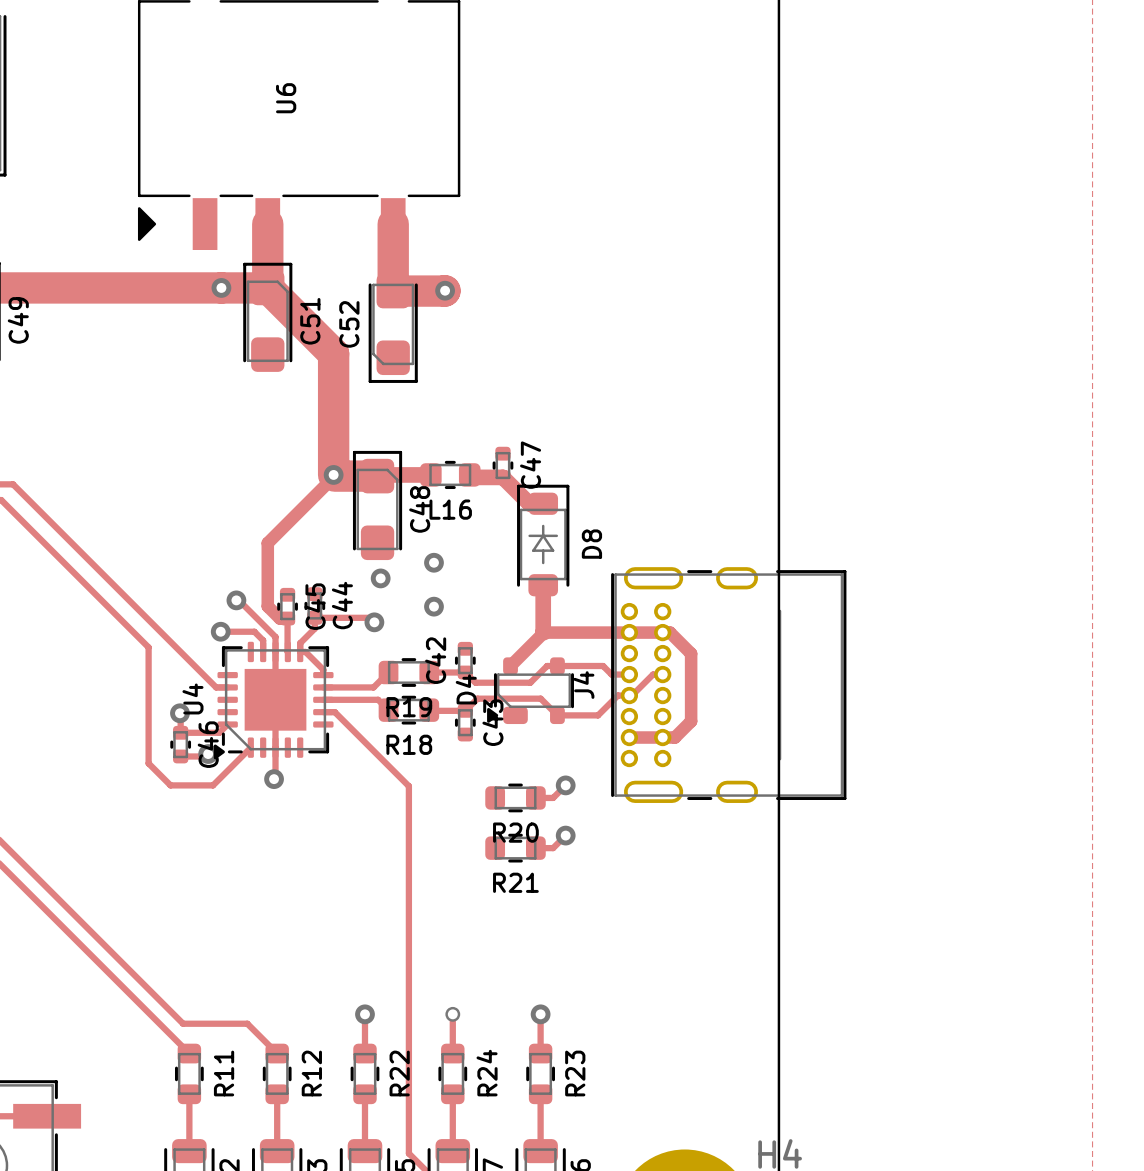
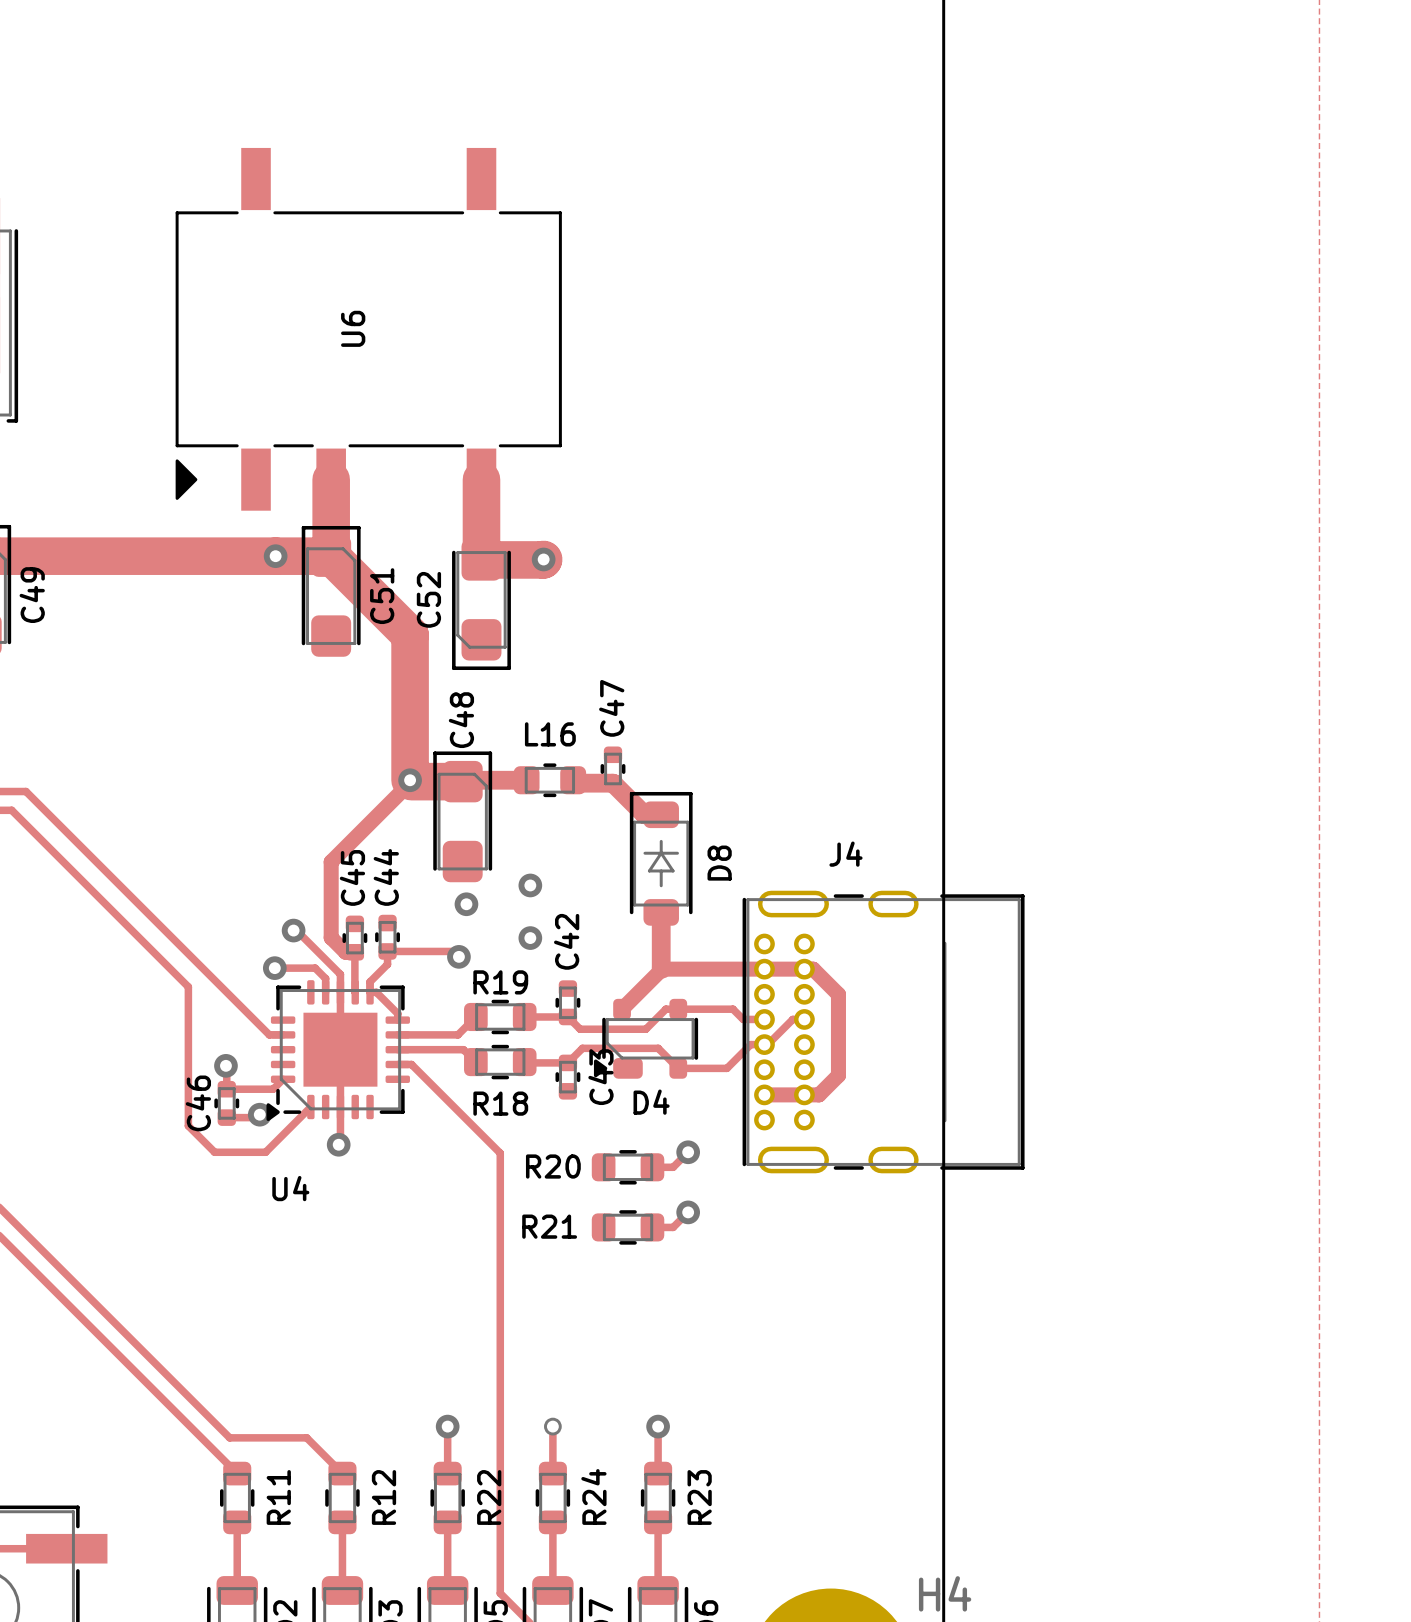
C47 name position: C47 (530, 465) -> C47 (611, 708)
C48 name position: C48 (419, 509) -> C48 (461, 720)
L16 name position: L16 (450, 509) -> L16 (550, 734)
C44 name position: C44 (342, 605) -> C44 (386, 877)
C45 name position: C45 (315, 606) -> C45 (352, 877)
C42 name position: C42 (435, 660) -> C42 (566, 941)
J4 name rotation: 0° (583, 685) -> 90° clockwise (845, 854)
J4 name position: J4 (583, 685) -> J4 (845, 854)
D4 name rotation: 0° (466, 689) -> 90° clockwise (651, 1102)
D4 name position: D4 (466, 689) -> D4 (651, 1102)
U4 name rotation: 0° (192, 698) -> 90° clockwise (290, 1188)
U4 name position: U4 (192, 698) -> U4 (290, 1188)
R19 name position: R19 (409, 707) -> R19 (500, 982)
C46 name position: C46 (208, 744) -> C46 (198, 1103)
R20 name position: R20 (515, 832) -> R20 (553, 1166)
R21 name position: R21 (515, 882) -> R21 (549, 1226)

